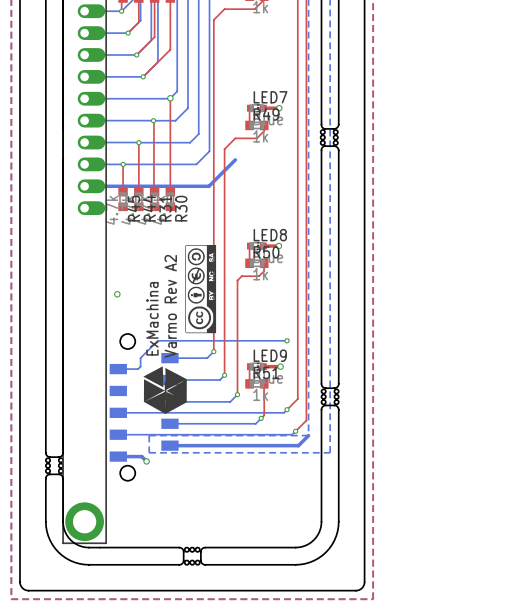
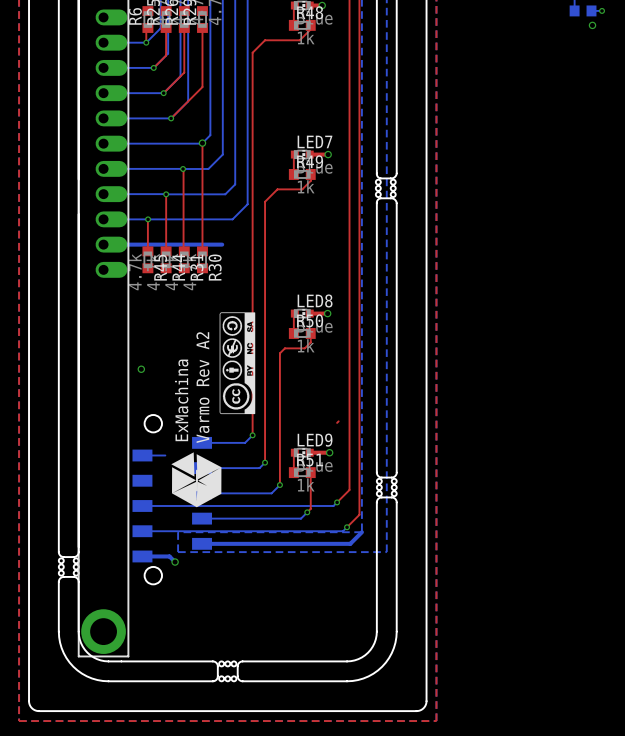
bottom track: (235, 159) (208, 186) (187, 186) -> none
bottom track: (287, 340) (157, 340) (140, 358) (140, 366) (138, 369) -> none
via: (287, 340) -> none

